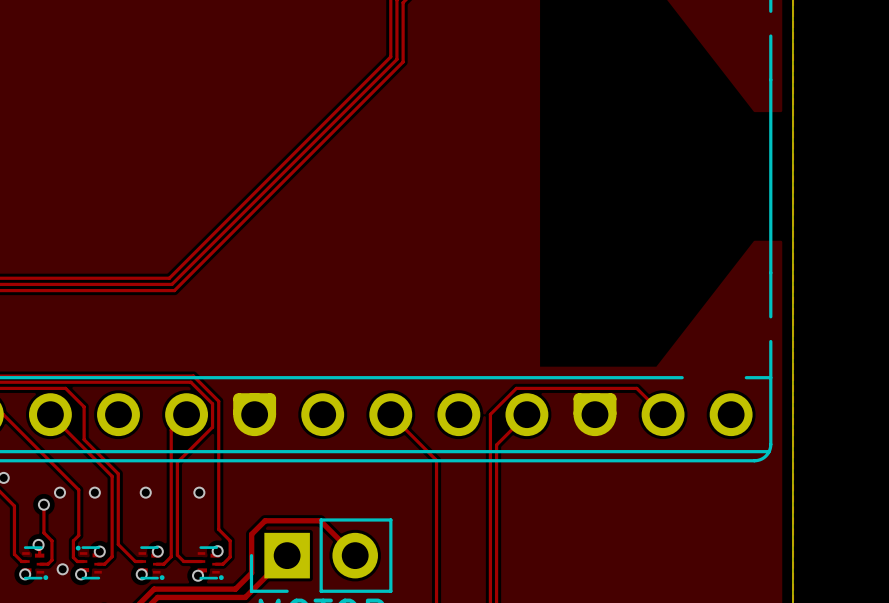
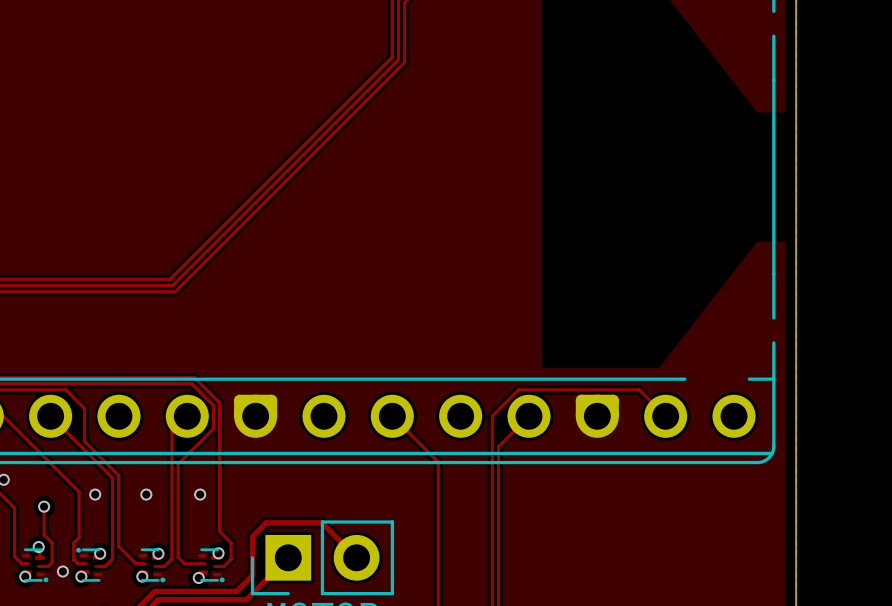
via: (60, 492) -> none

